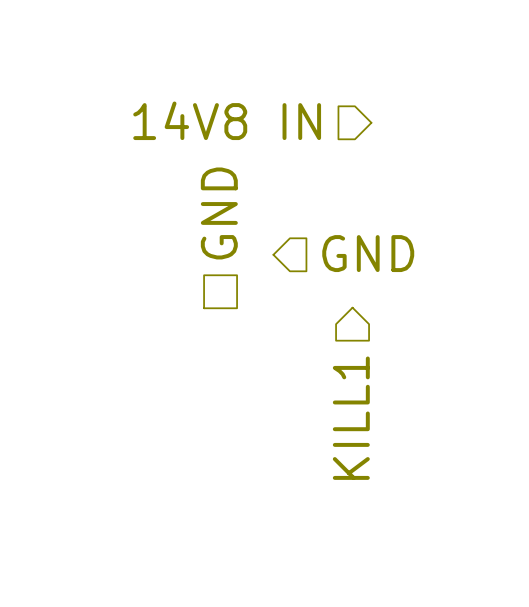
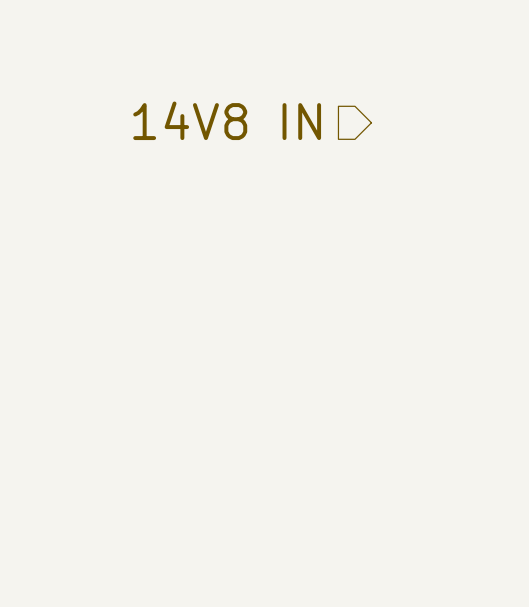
hierarchical label: GND (219, 213) -> none
hierarchical label: GND (368, 253) -> none
hierarchical label: KILL1 (351, 418) -> none

